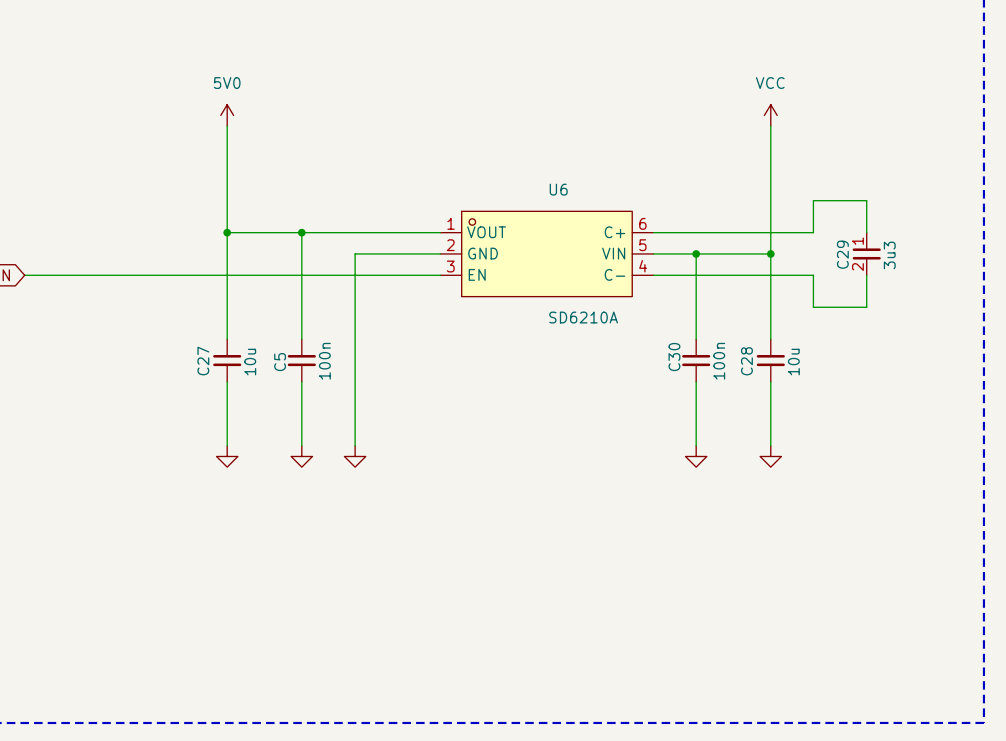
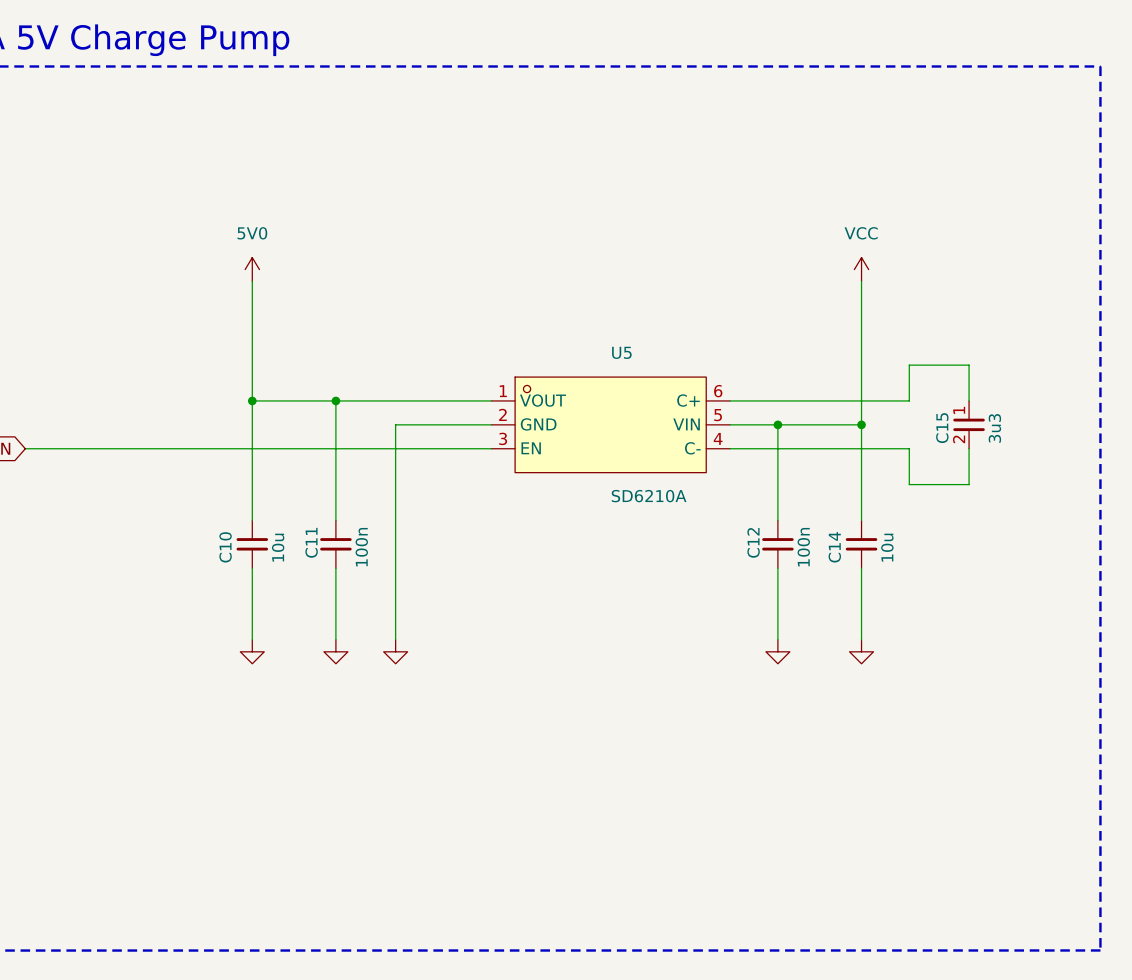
U6 name: U6 (558, 189) -> U5 (621, 352)
C29 name: C29 (842, 254) -> C15 (942, 428)
C30 name: C30 (674, 357) -> C12 (753, 542)
C27 name: C27 (203, 361) -> C10 (225, 547)
C28 name: C28 (746, 361) -> C14 (834, 547)
C5 name: C5 (280, 362) -> C11 (311, 542)

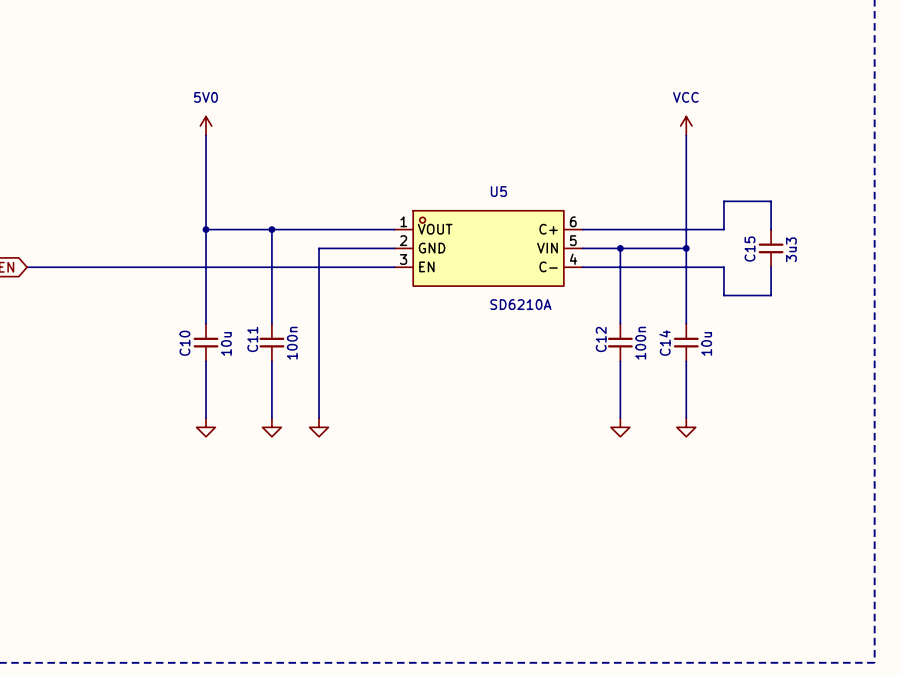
C15 pin number: 1 (959, 410) -> none
C15 pin number: 2 (959, 439) -> none

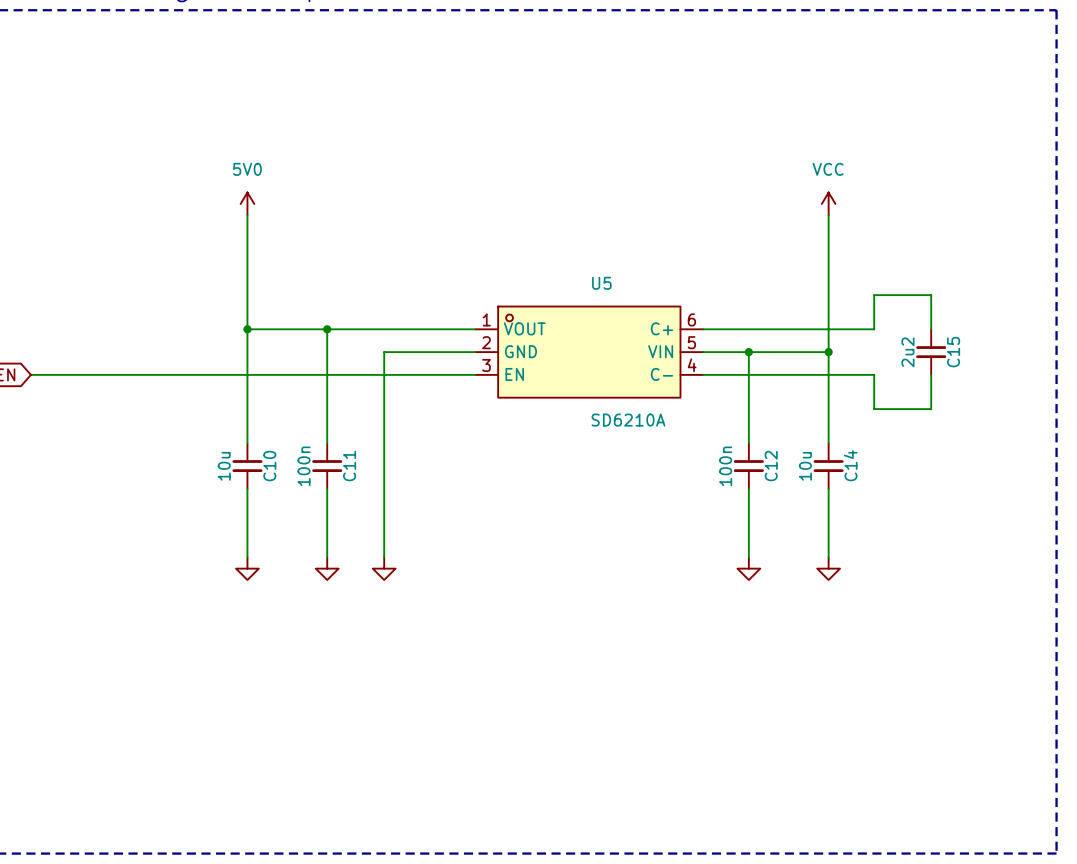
C15 name position: C15 (749, 249) -> C15 (953, 352)
C15 value: 3u3 (791, 249) -> 2u2 (907, 352)
C11 name position: C11 (252, 339) -> C11 (349, 466)
C12 name position: C12 (601, 339) -> C12 (771, 466)
C10 name position: C10 (184, 343) -> C10 (269, 466)
C10 value position: 10u (226, 343) -> 10u (224, 466)
C11 value position: 100n (292, 343) -> 100n (304, 466)
C12 value position: 100n (640, 343) -> 100n (725, 466)
C14 name position: C14 (665, 343) -> C14 (850, 465)
C14 value position: 10u (706, 343) -> 10u (805, 466)

